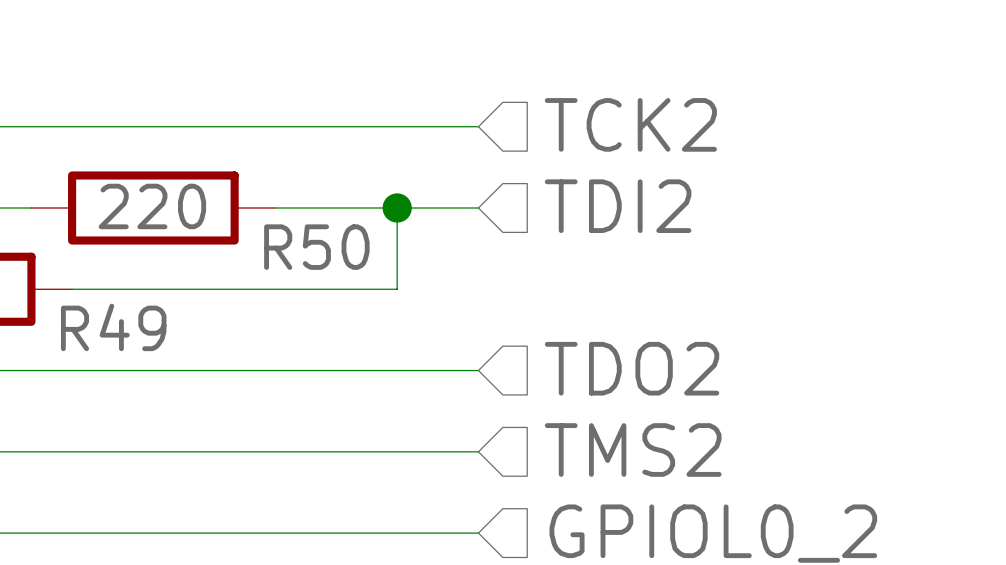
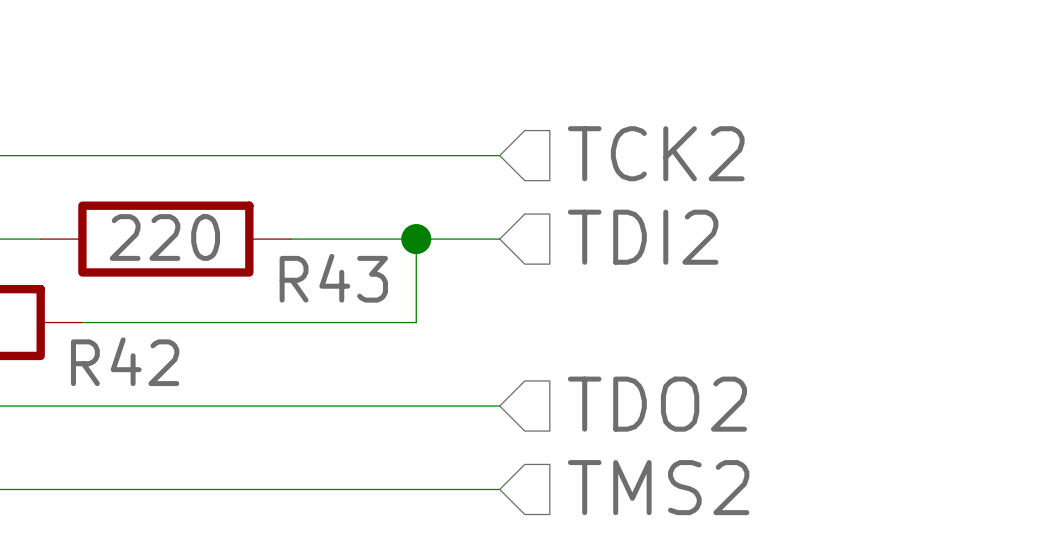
R50 name: R50 (316, 247) -> R43 (333, 278)
R49 name: R49 (113, 327) -> R42 (125, 361)

